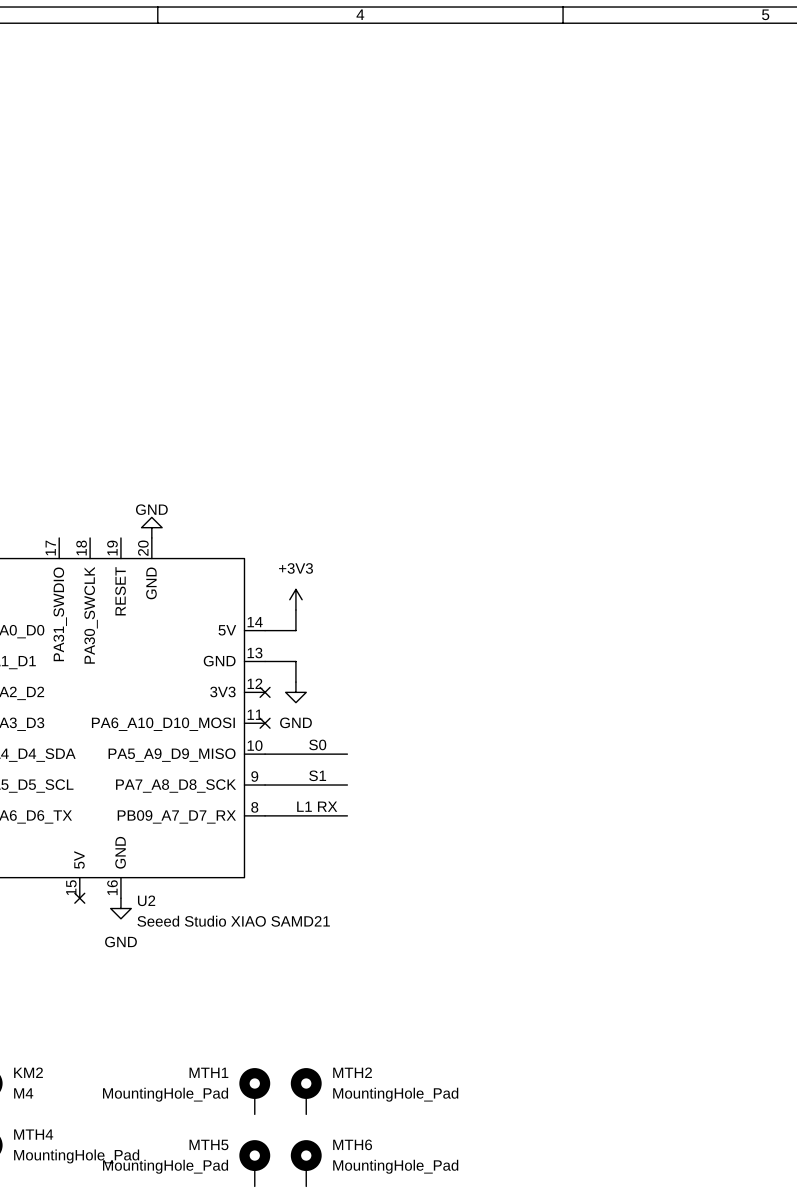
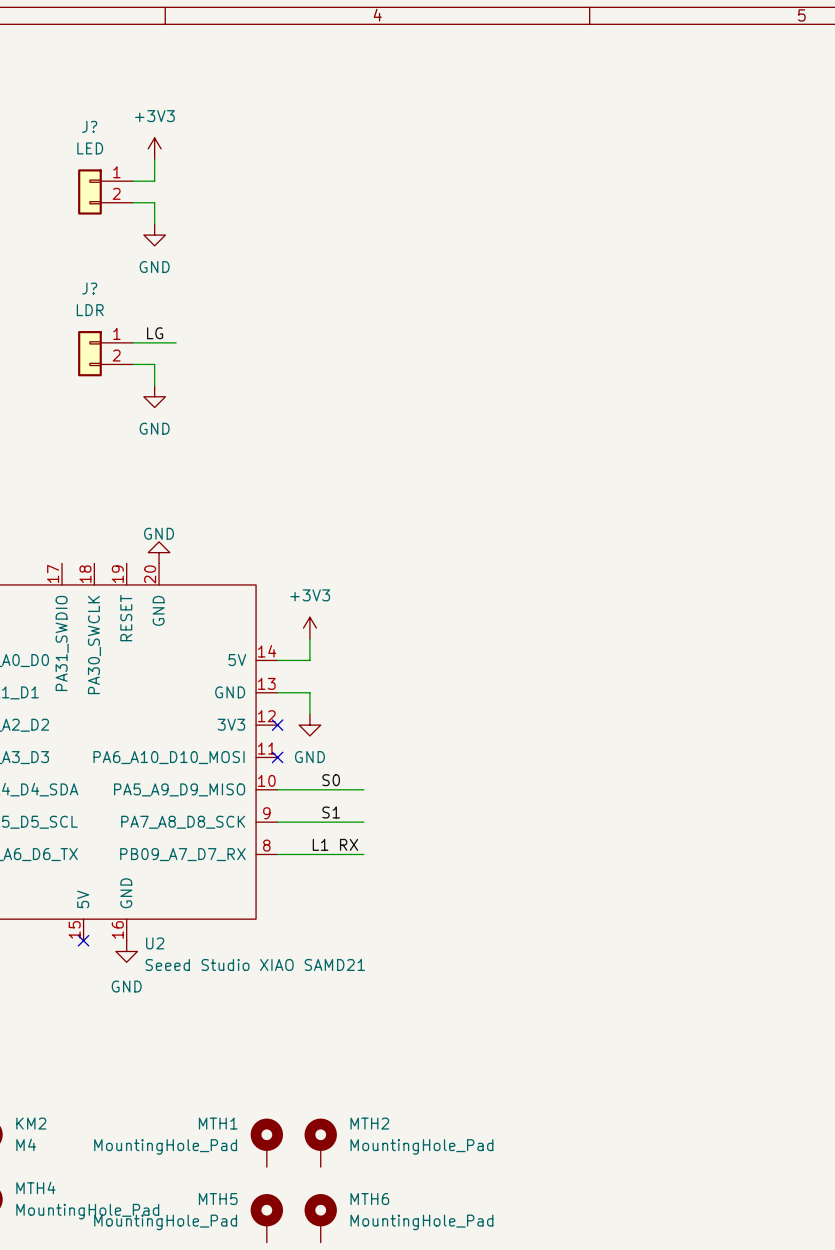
power symbol: none -> +3V3 (154, 148)
wire: none -> (154, 159) (154, 181) (133, 181)
J?: none -> LED (105, 191)
wire: none -> (133, 202) (154, 202) (154, 224)
power symbol: none -> GND (154, 235)
label: none -> LG (155, 333)
wire: none -> (133, 342) (176, 342)
J?: none -> LDR (105, 353)
wire: none -> (133, 364) (154, 364) (154, 386)
power symbol: none -> GND (154, 396)

